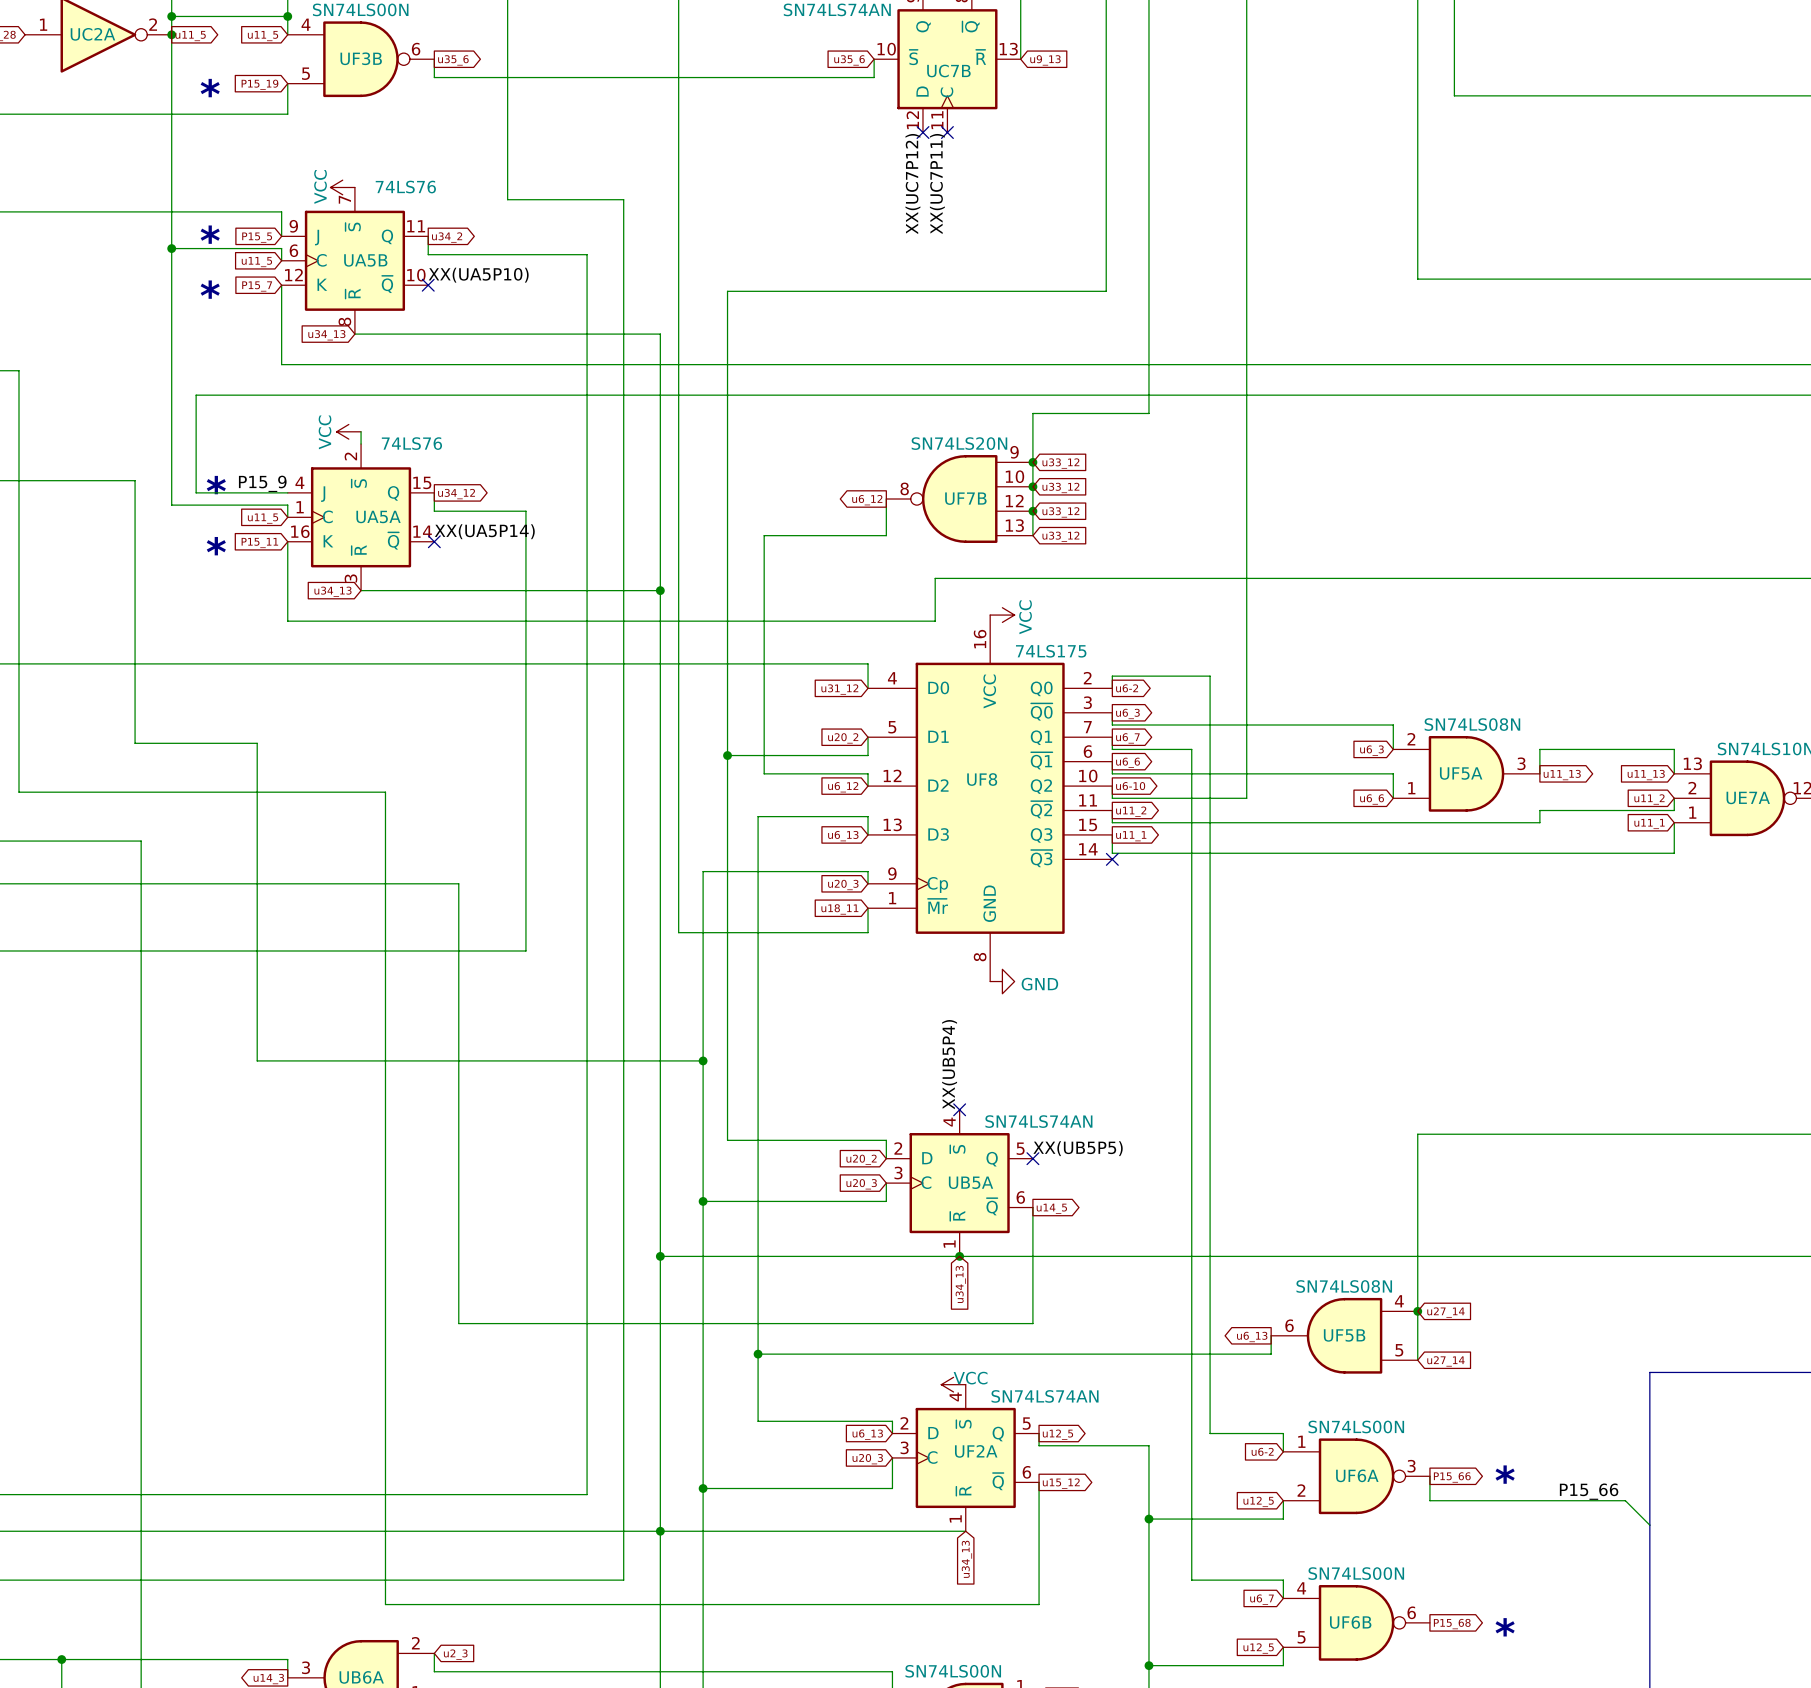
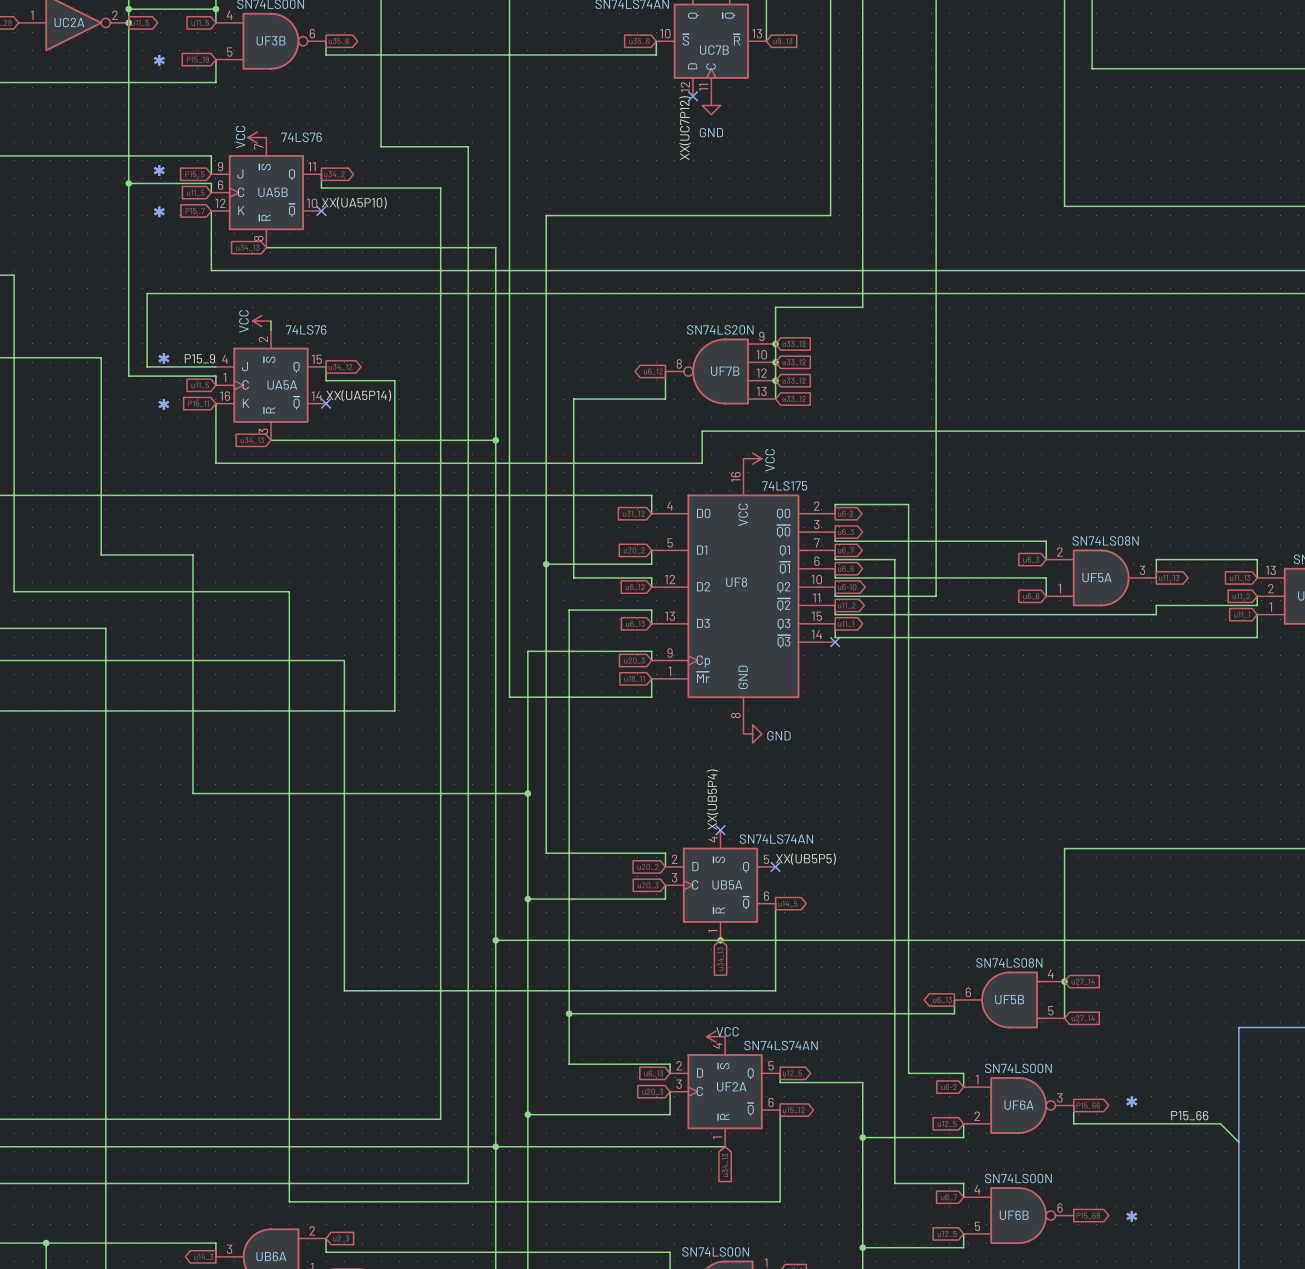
no-connect mark: (947, 132) -> none
power symbol: none -> GND (711, 105)
label: XX(UC7P11) (937, 184) -> none

